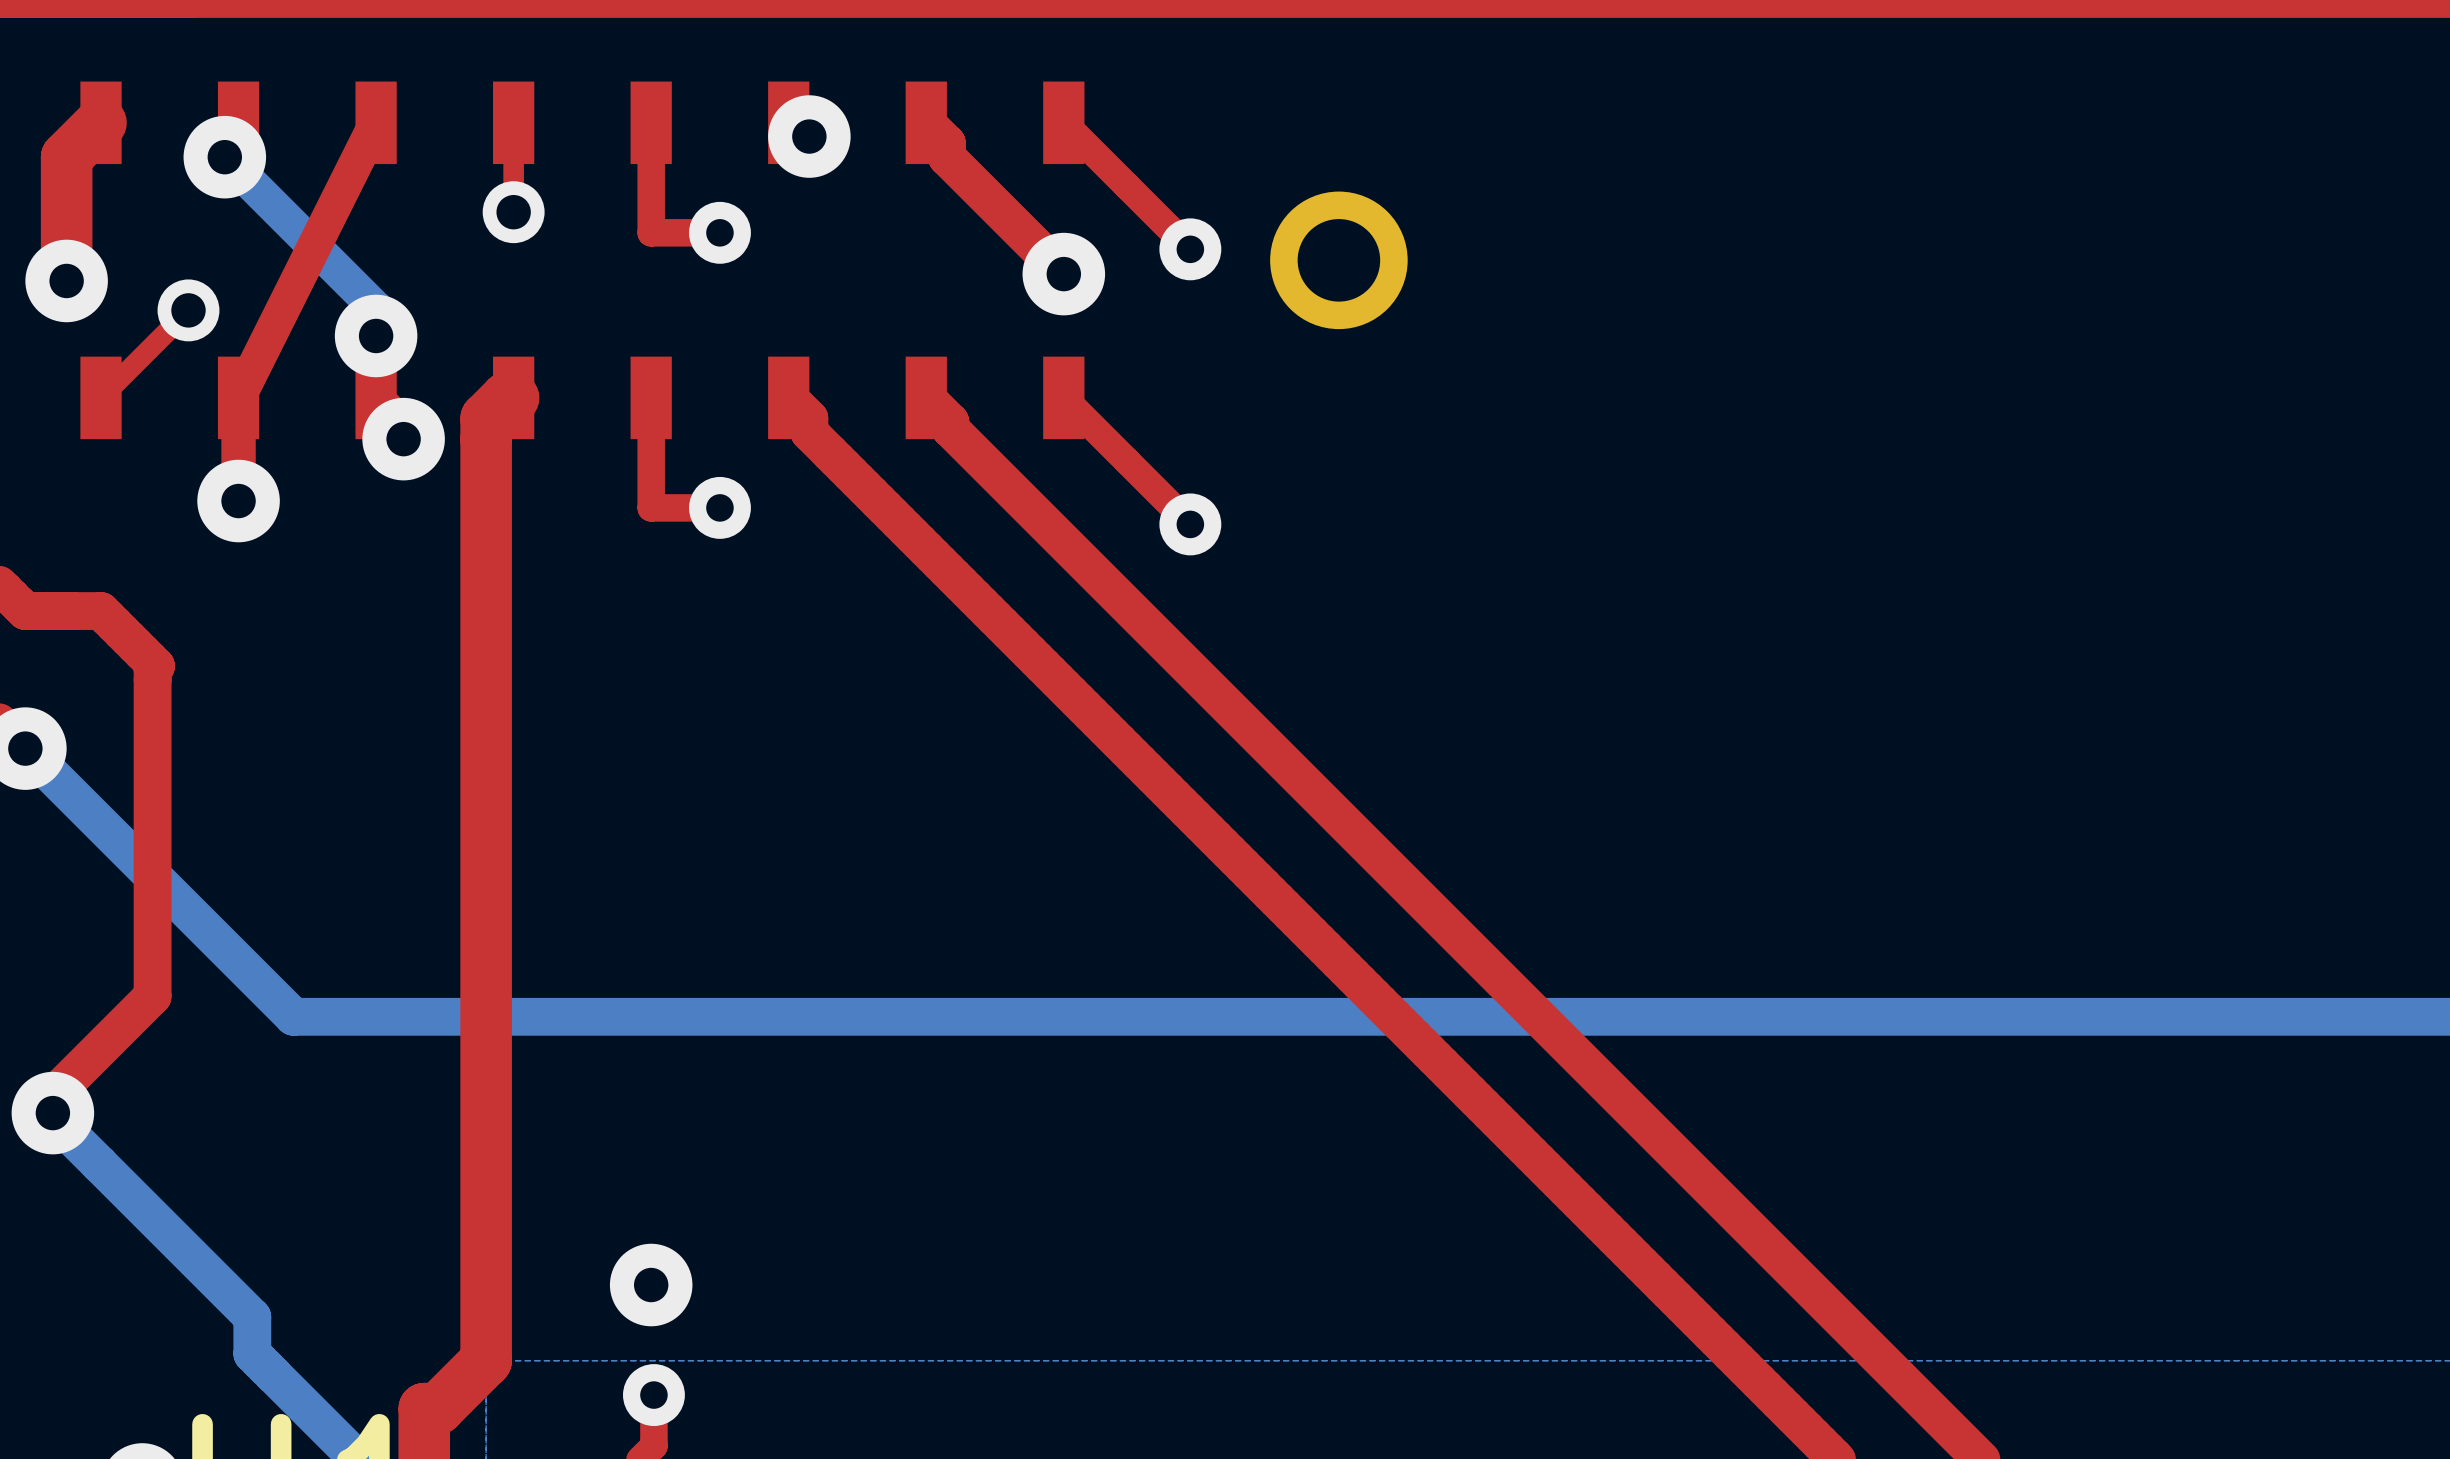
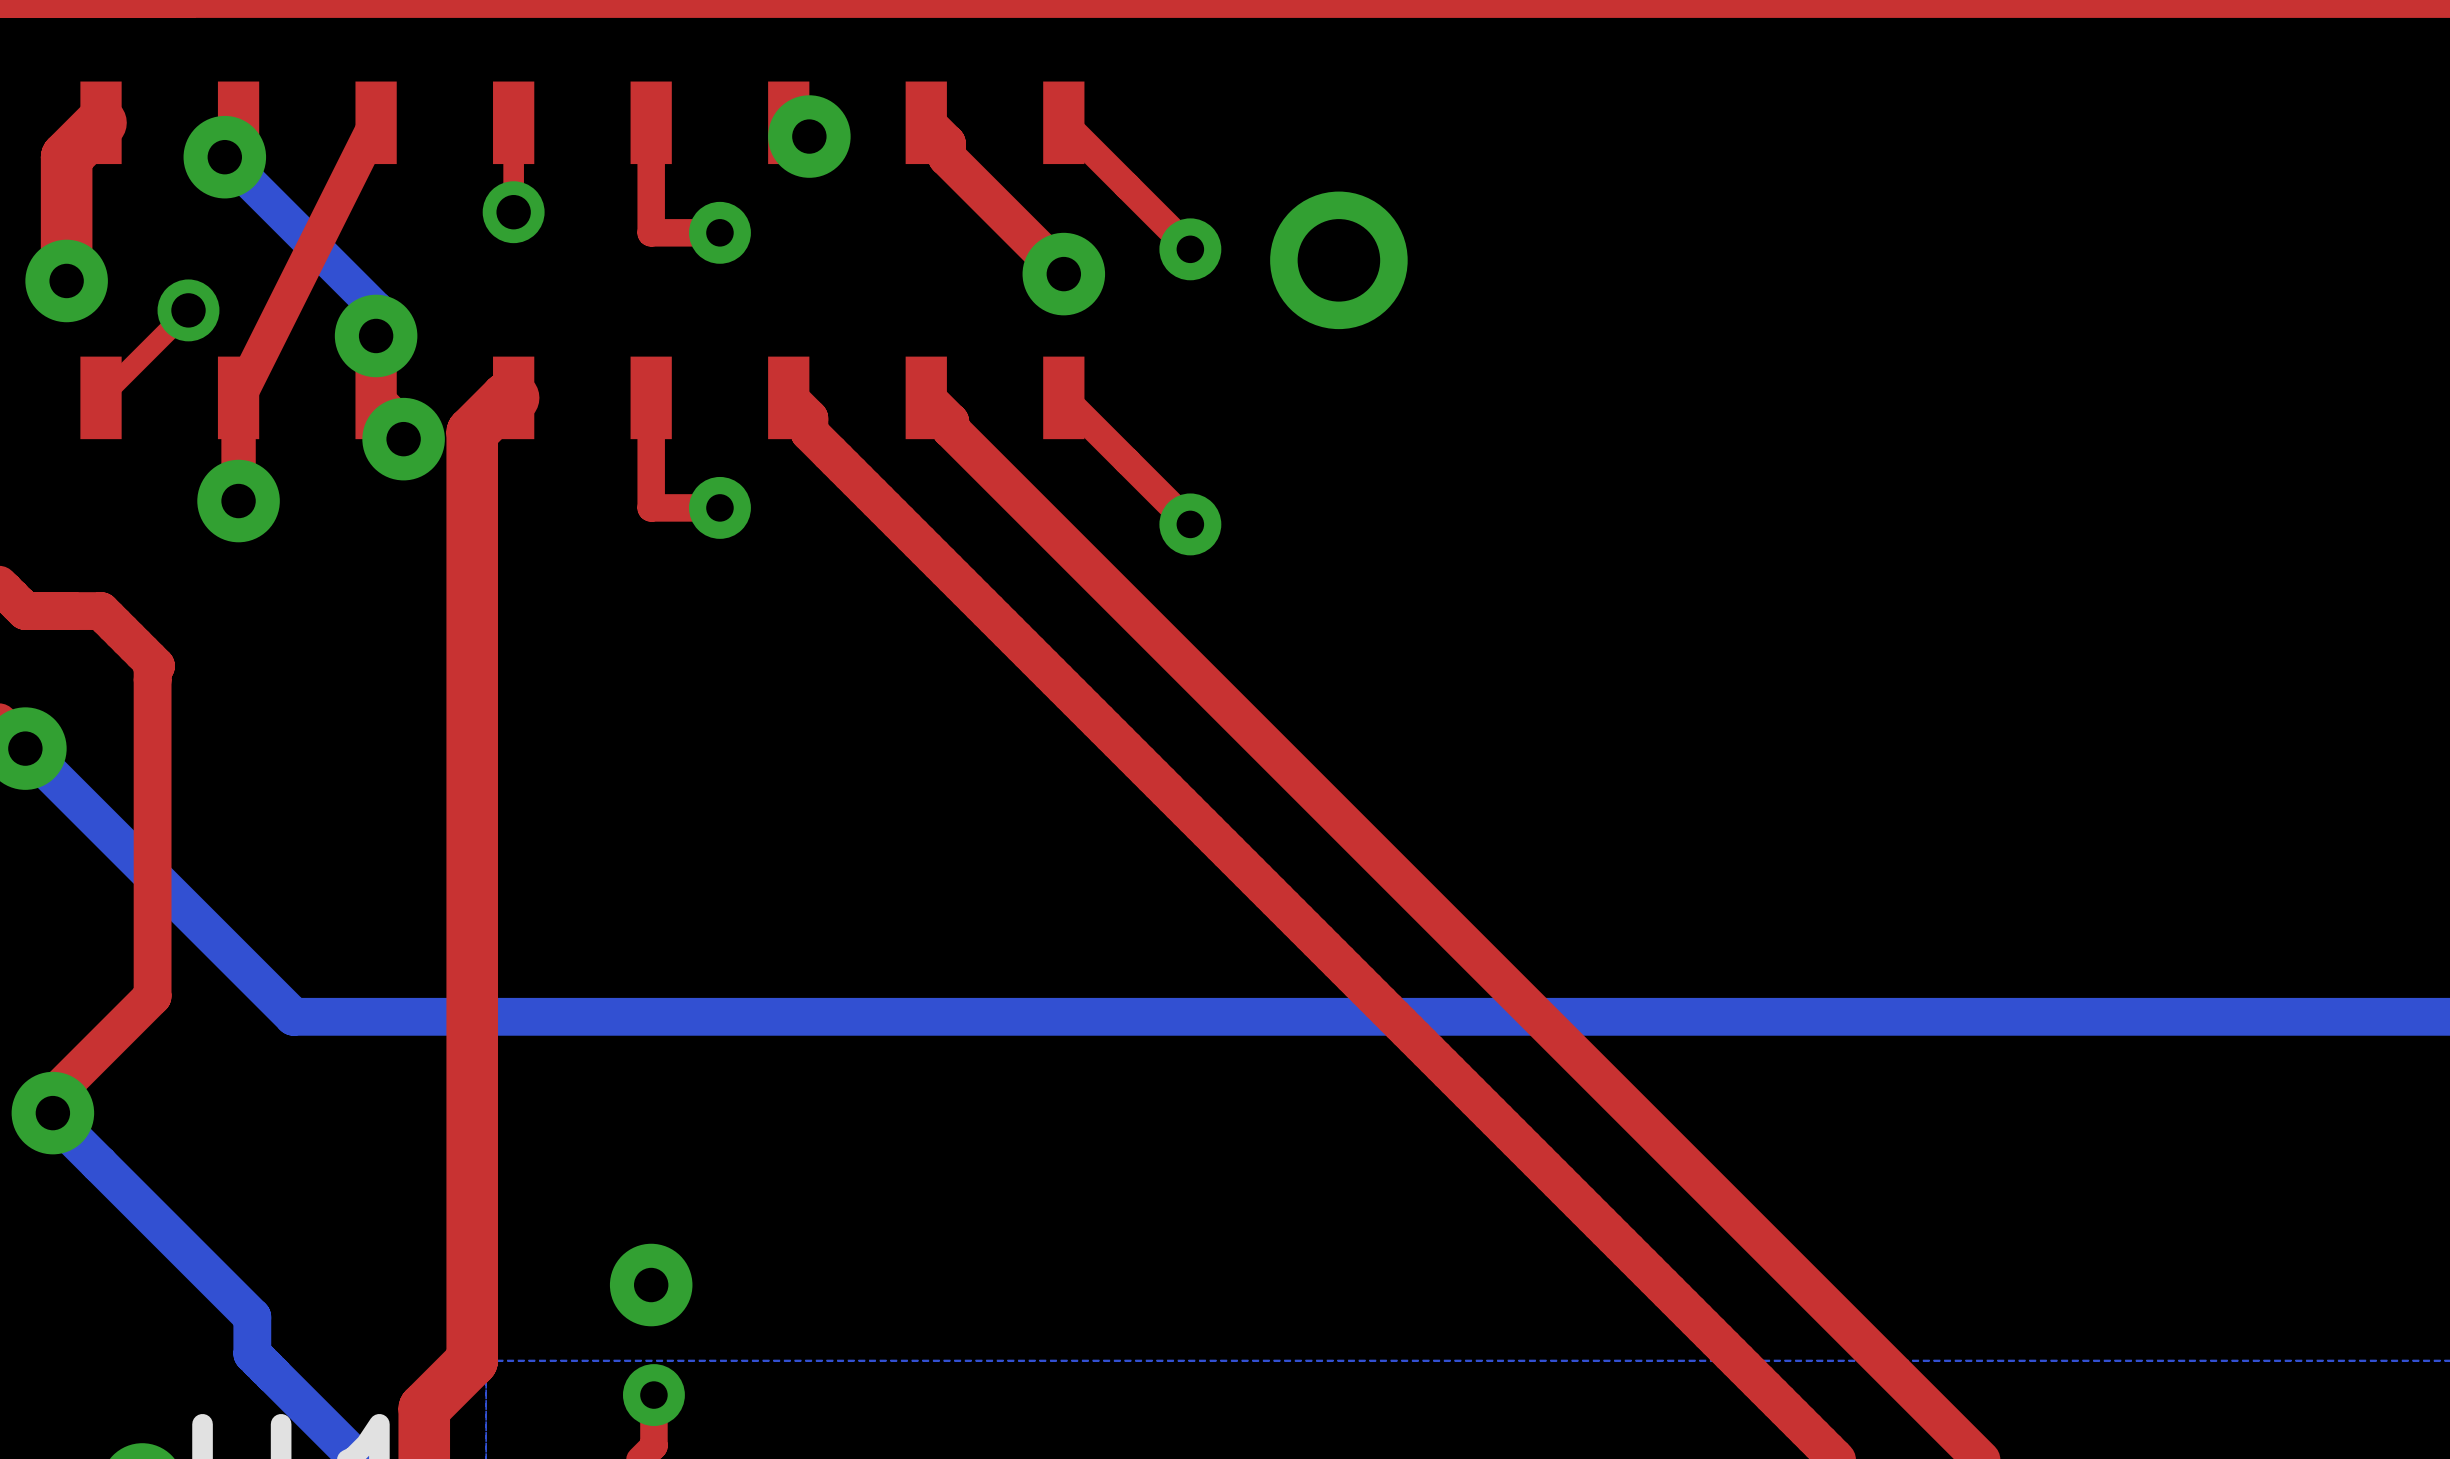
top track: (486, 418) (486, 1360) (438, 1408) (424, 1408) -> (486, 418) (472, 432) (472, 1360) (424, 1408)

